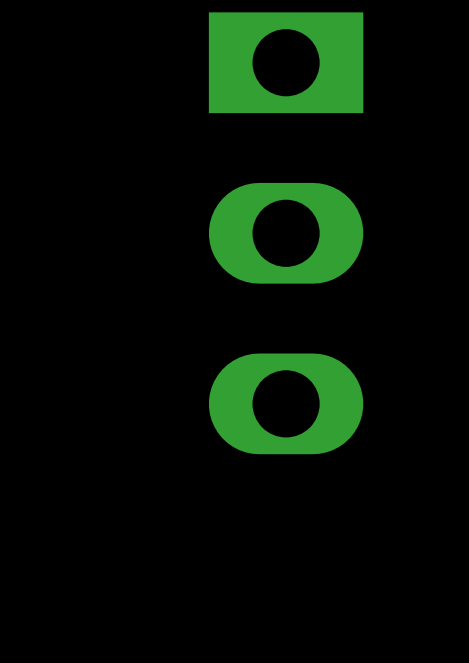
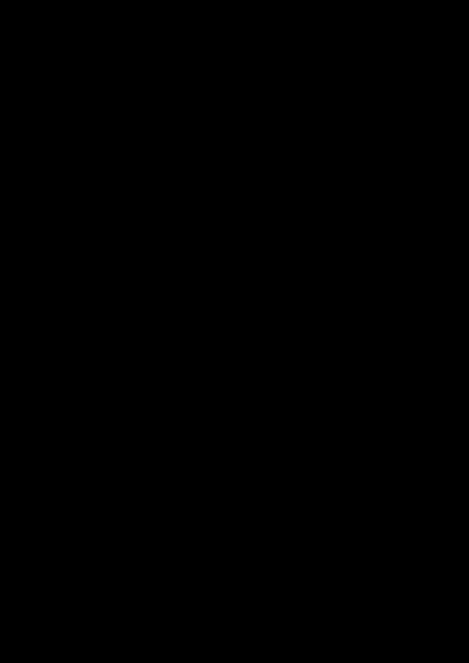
part: (286, 233) -> none

